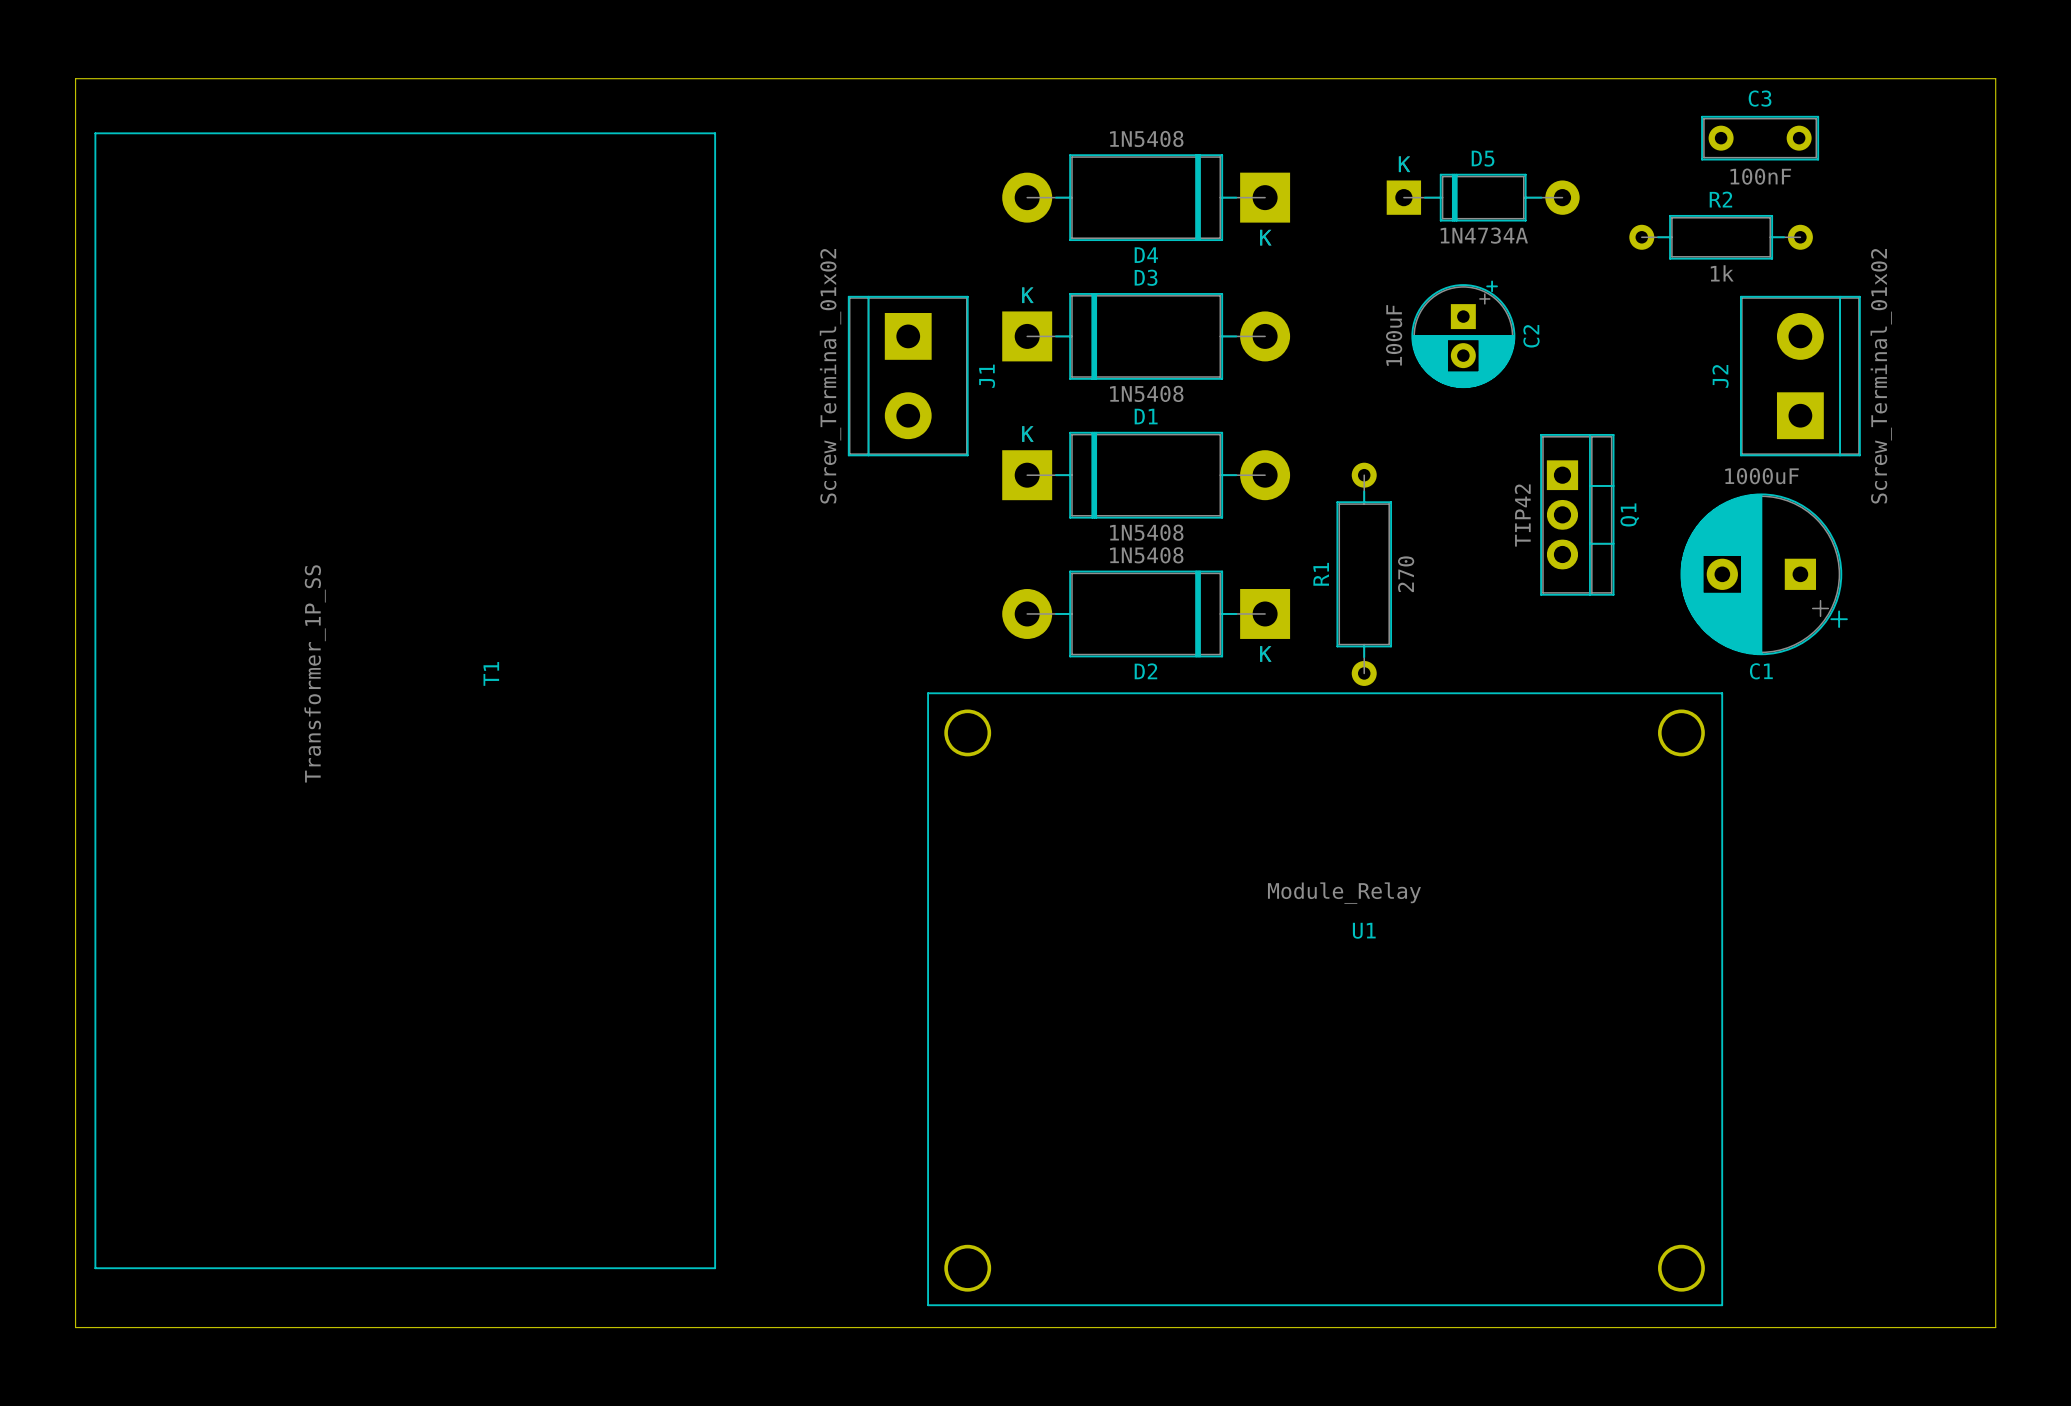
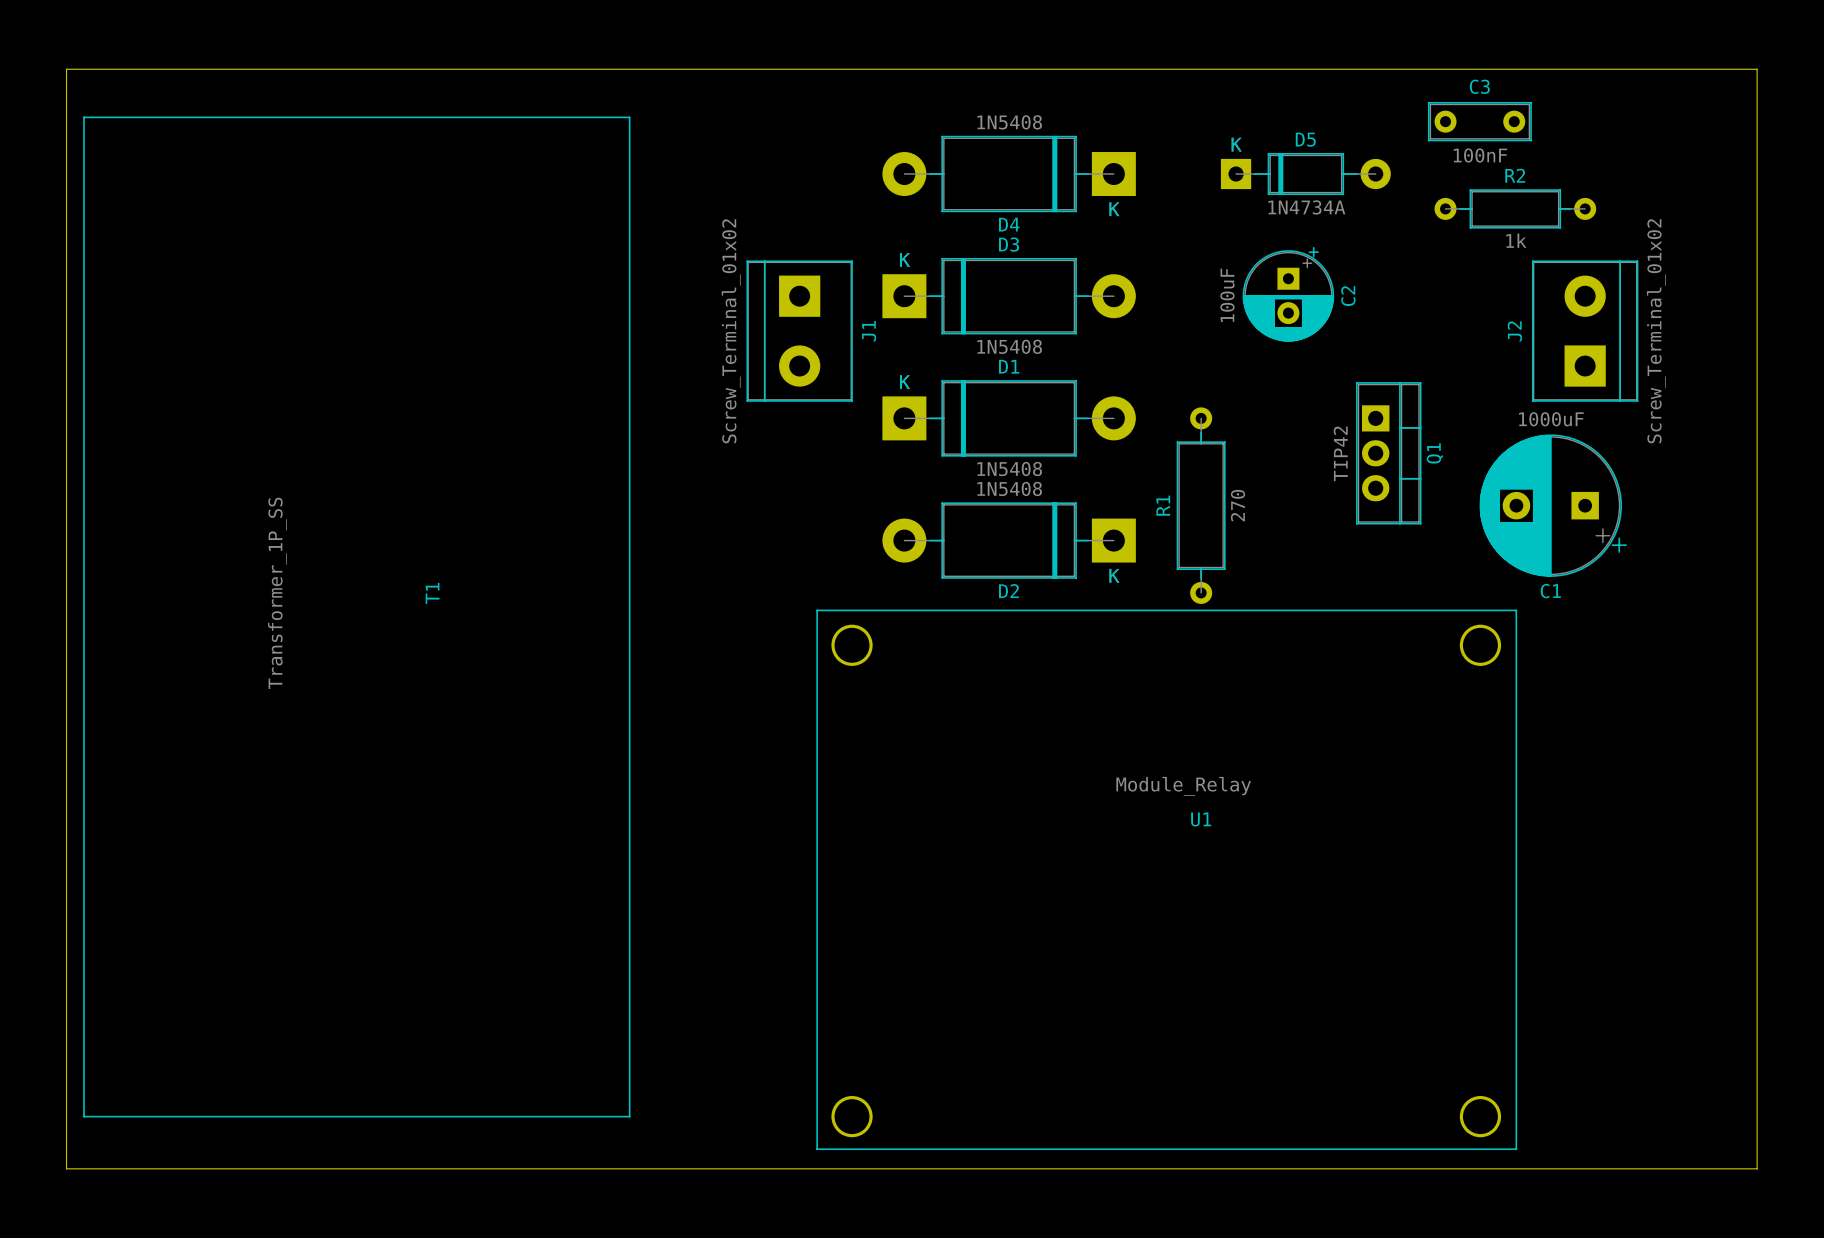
C3 position: (1760, 138) -> (1479, 121)

